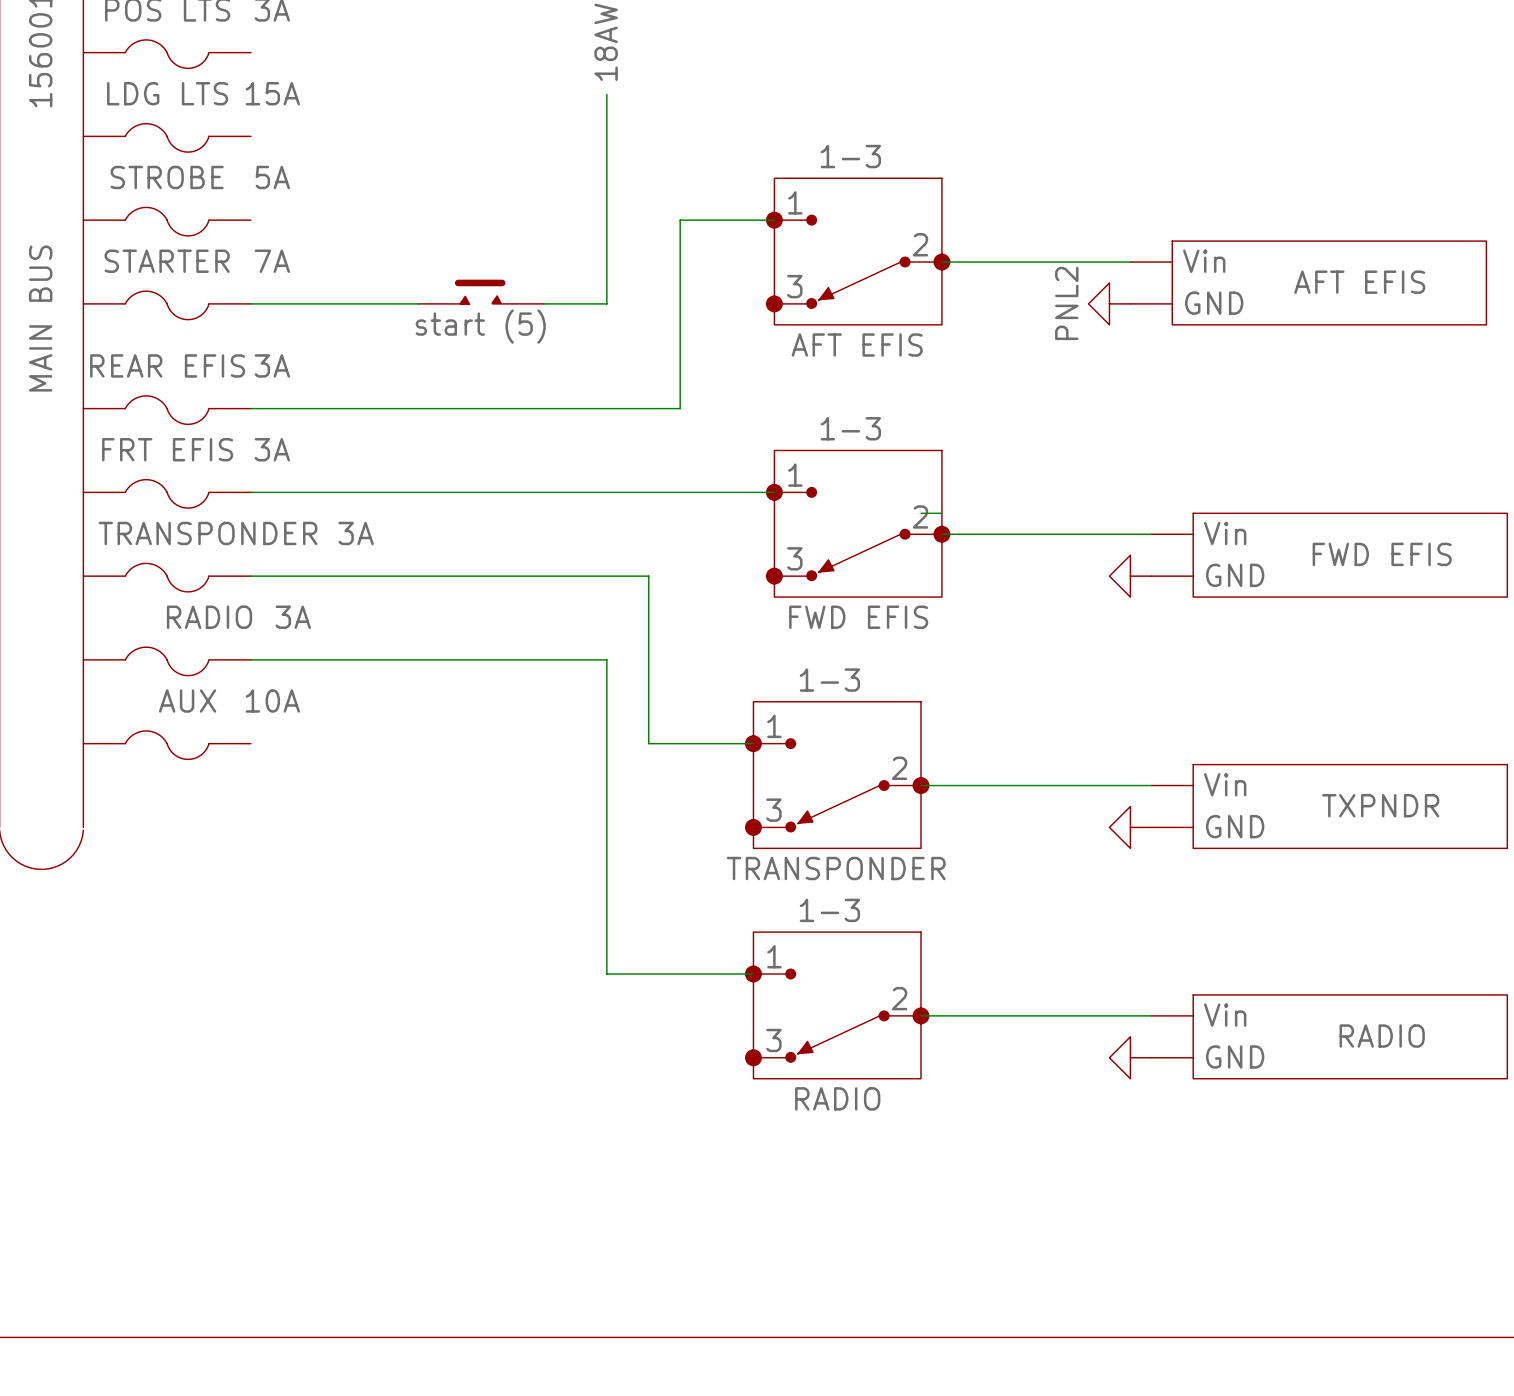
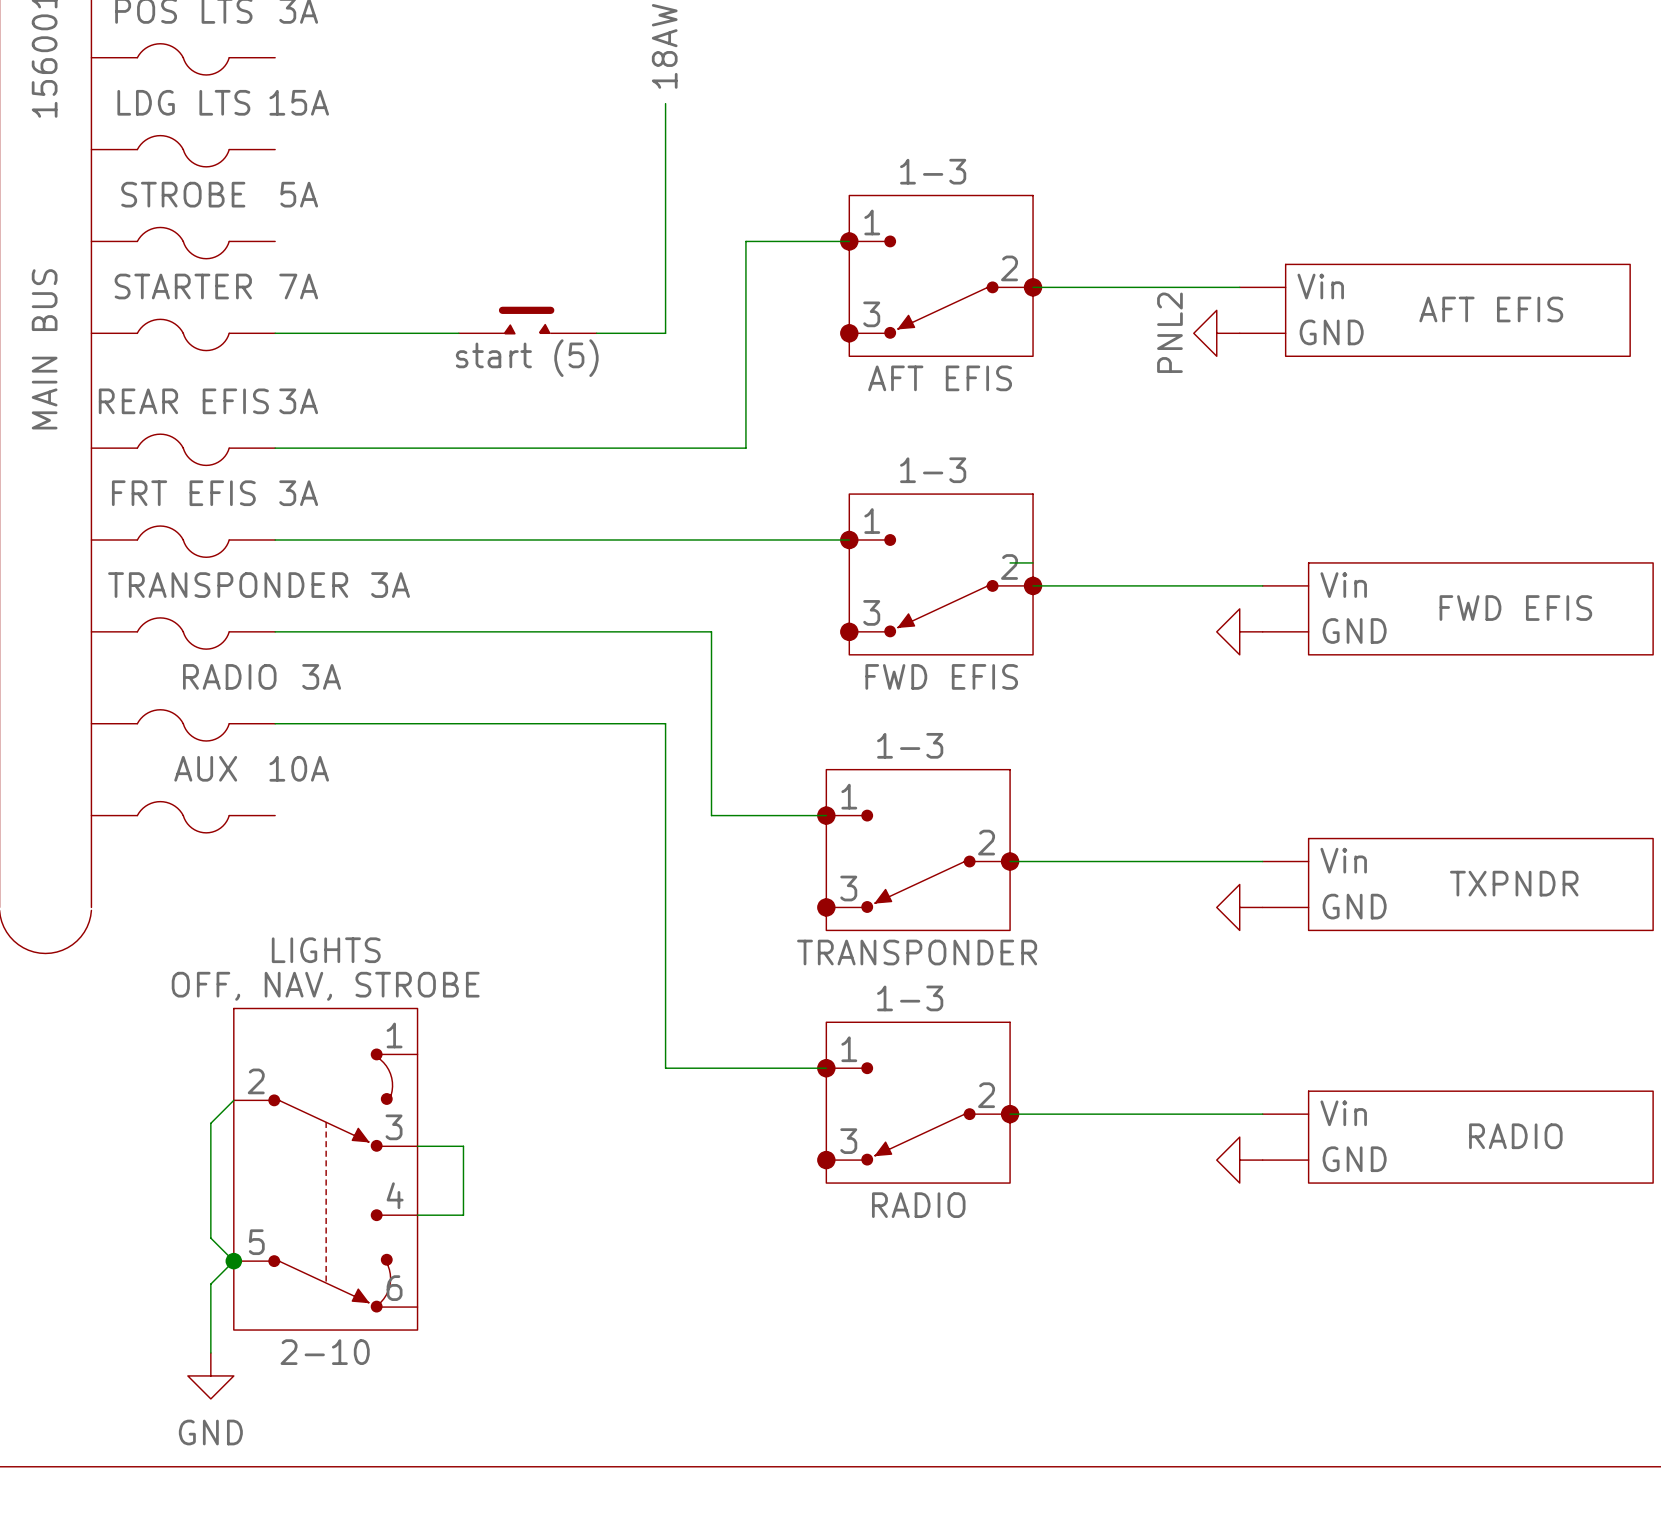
wire: none -> (233, 1100) (210, 1123) (210, 1238) (233, 1261) (210, 1284) (210, 1352)
wire: none -> (417, 1146) (463, 1146) (463, 1215) (417, 1215)
part: none -> 2-10 (325, 1169)
junction: none -> (233, 1261)
power symbol: none -> GND (210, 1375)

